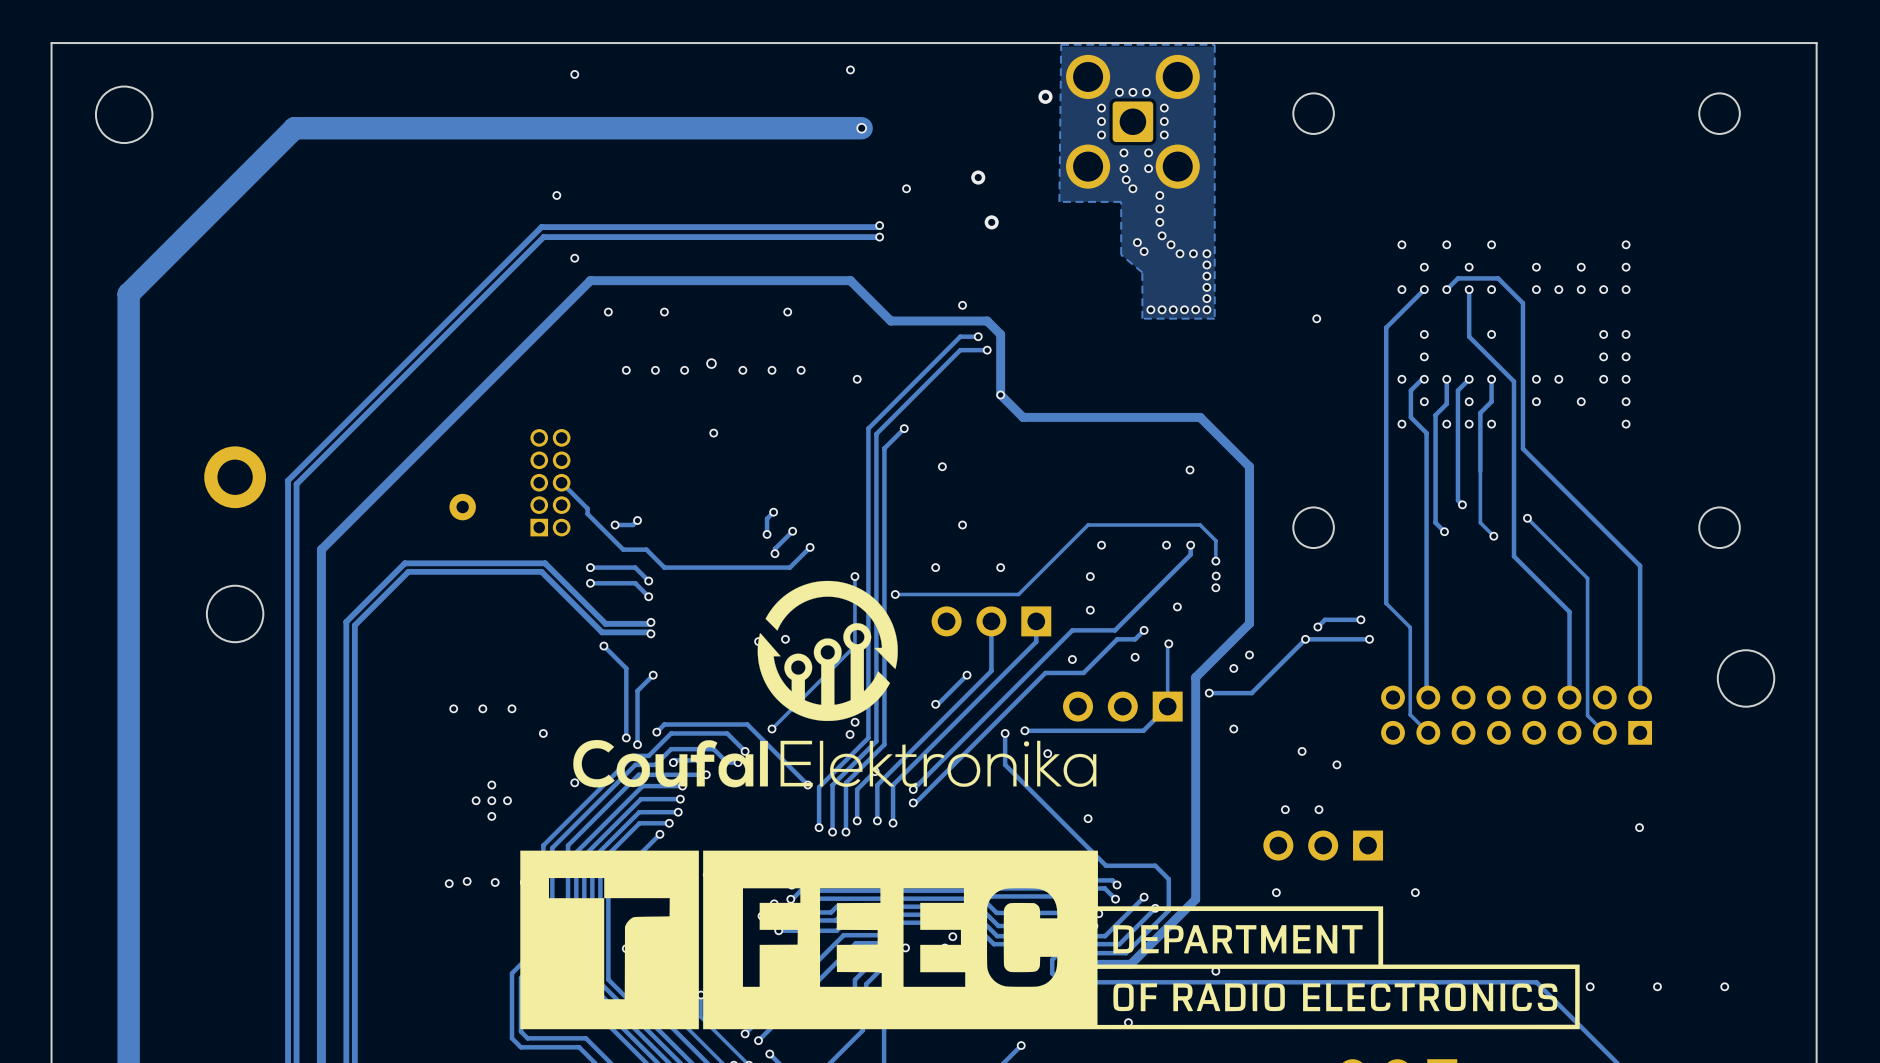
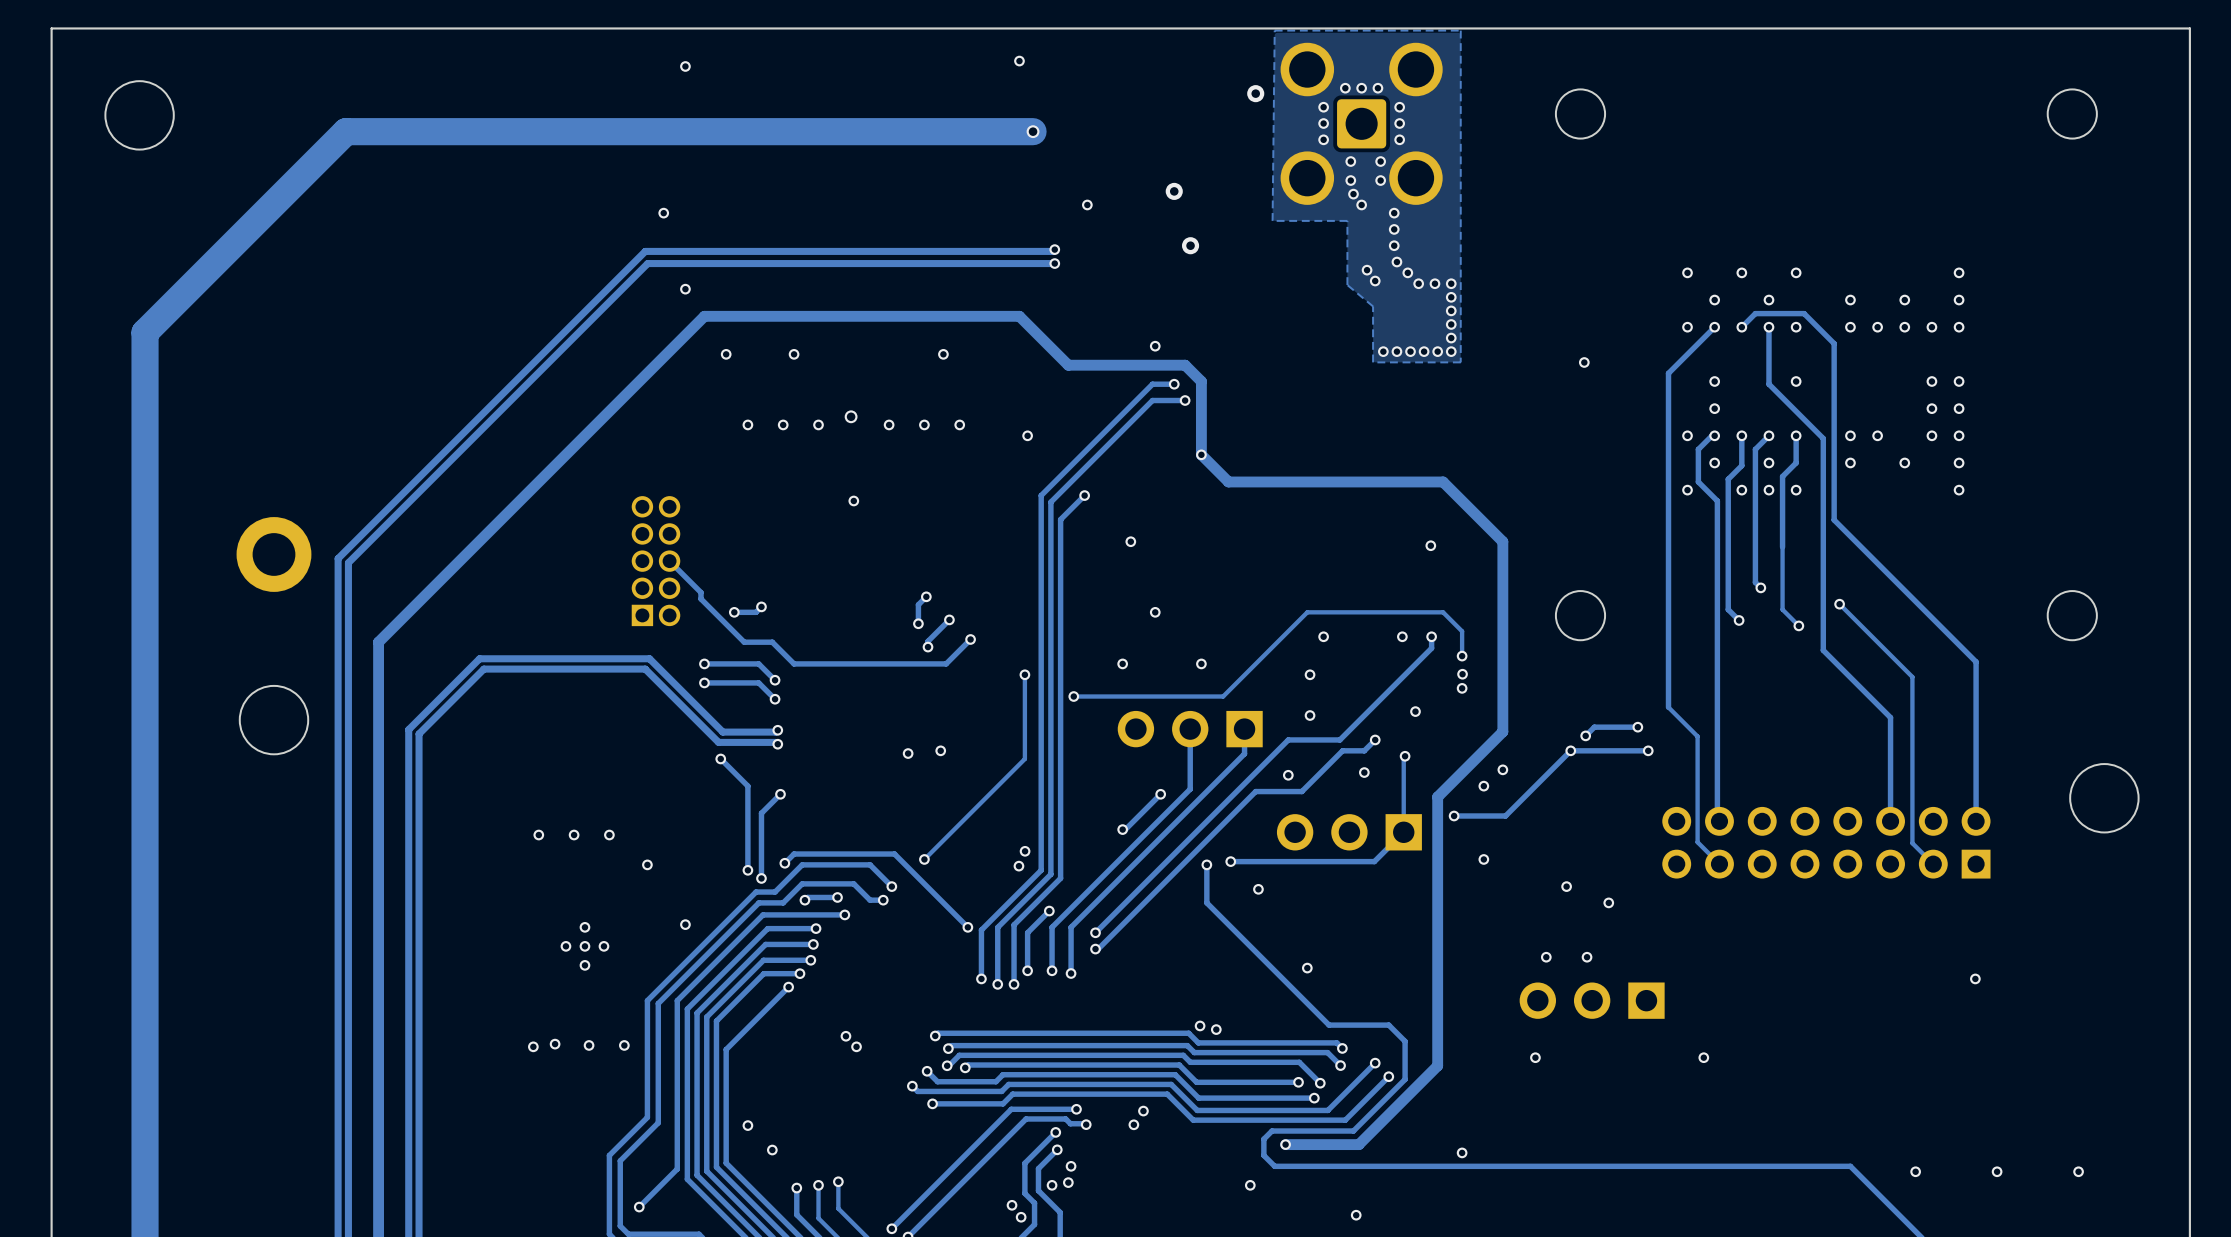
part: (462, 507) -> none
drawing: [573, 580, 1097, 788] -> none
drawing: [520, 850, 1580, 1030] -> none

